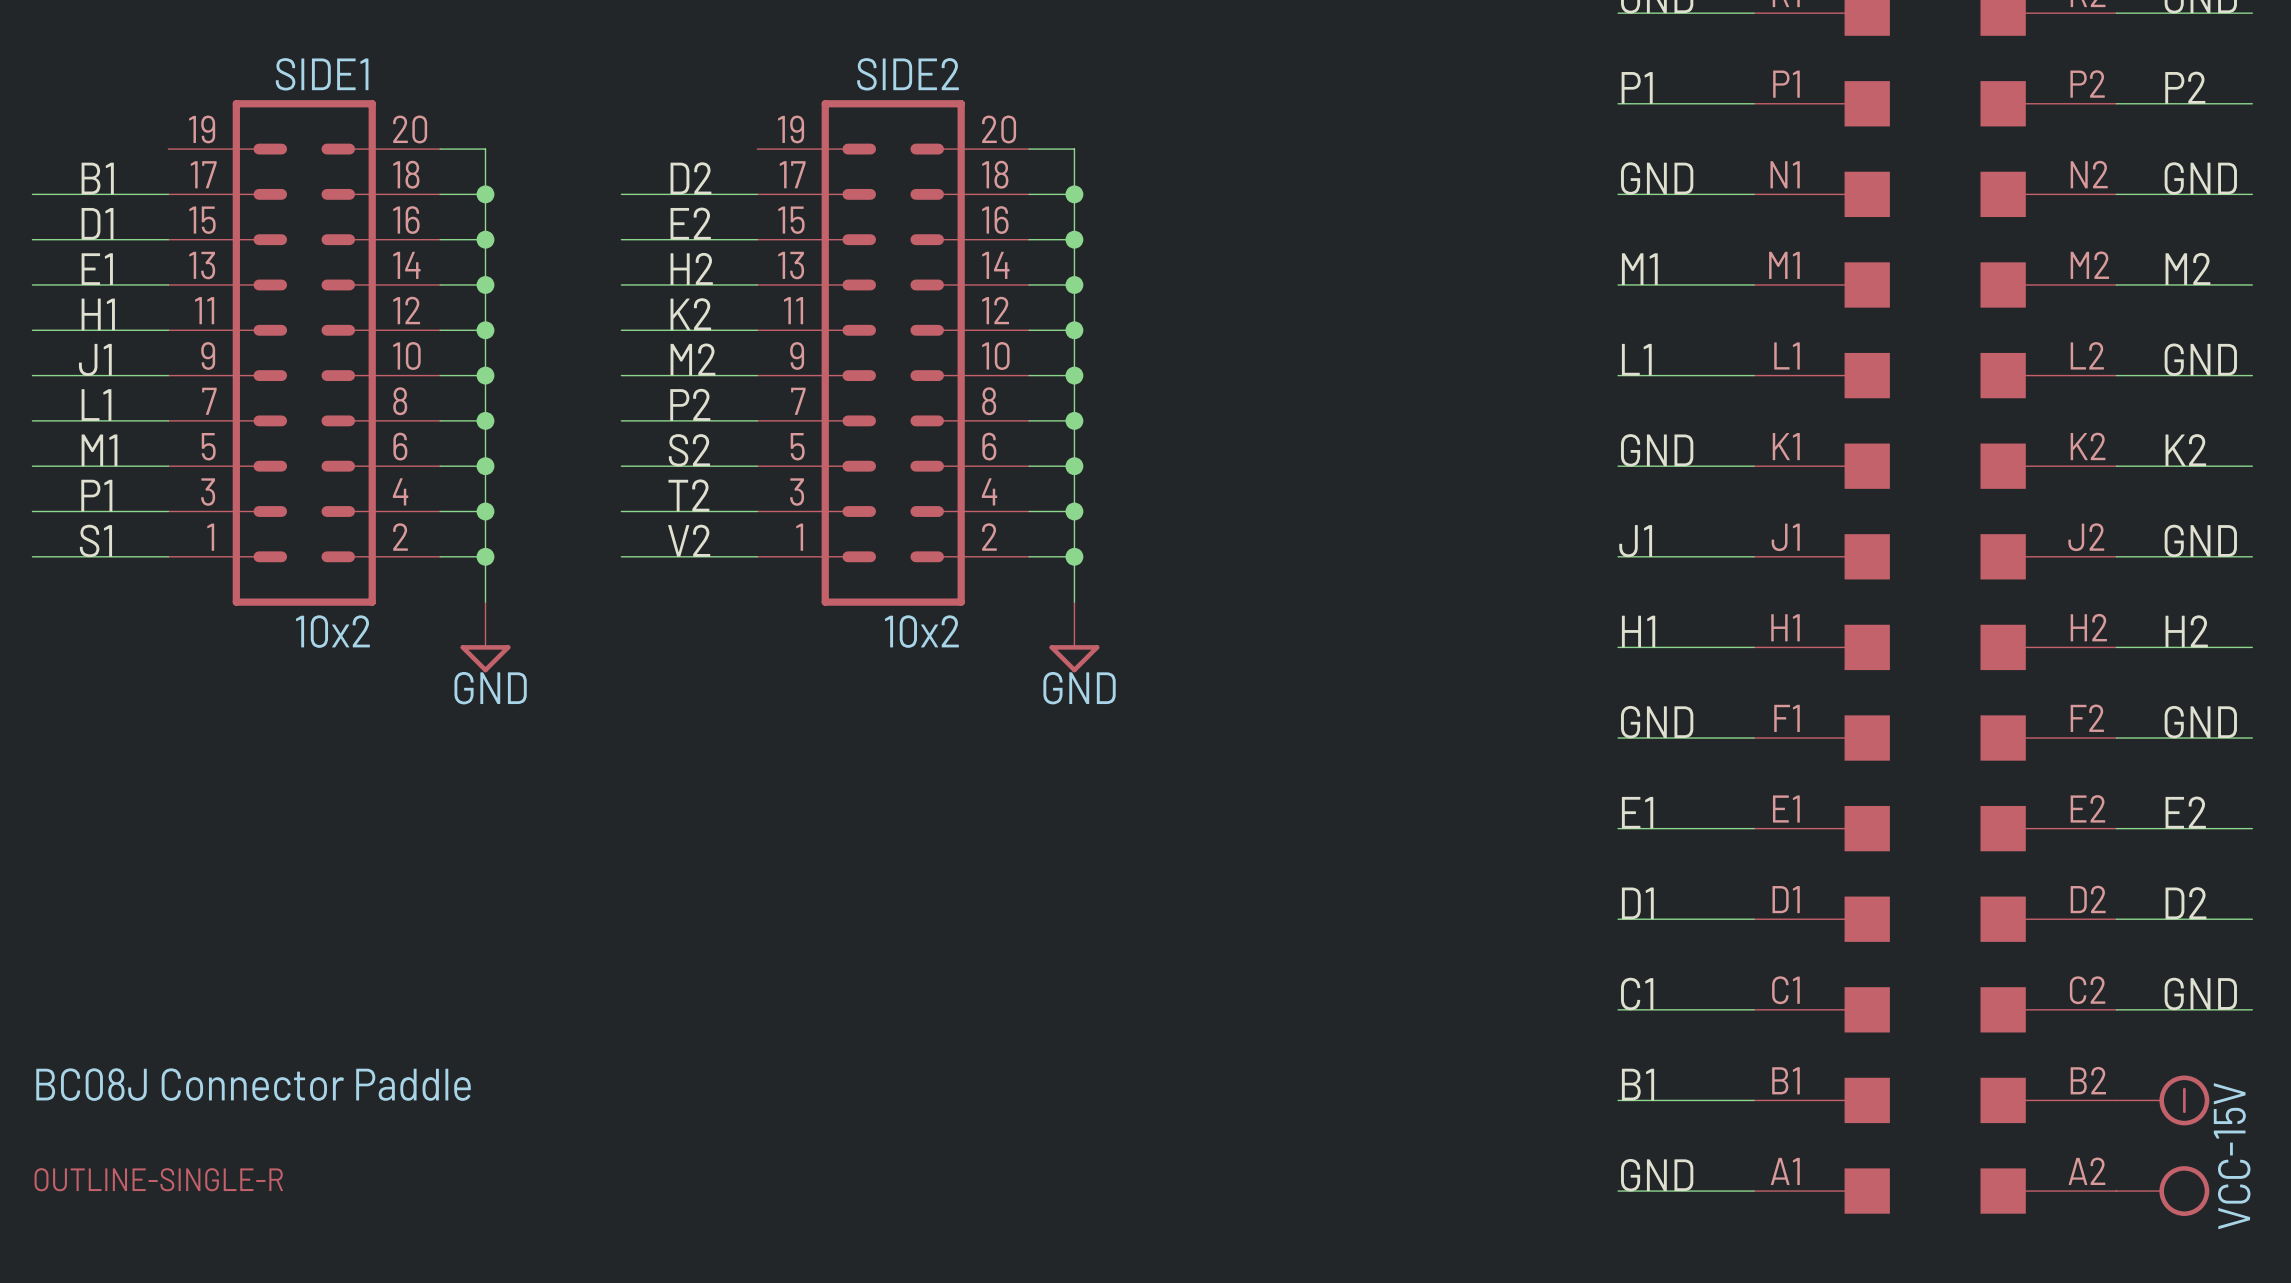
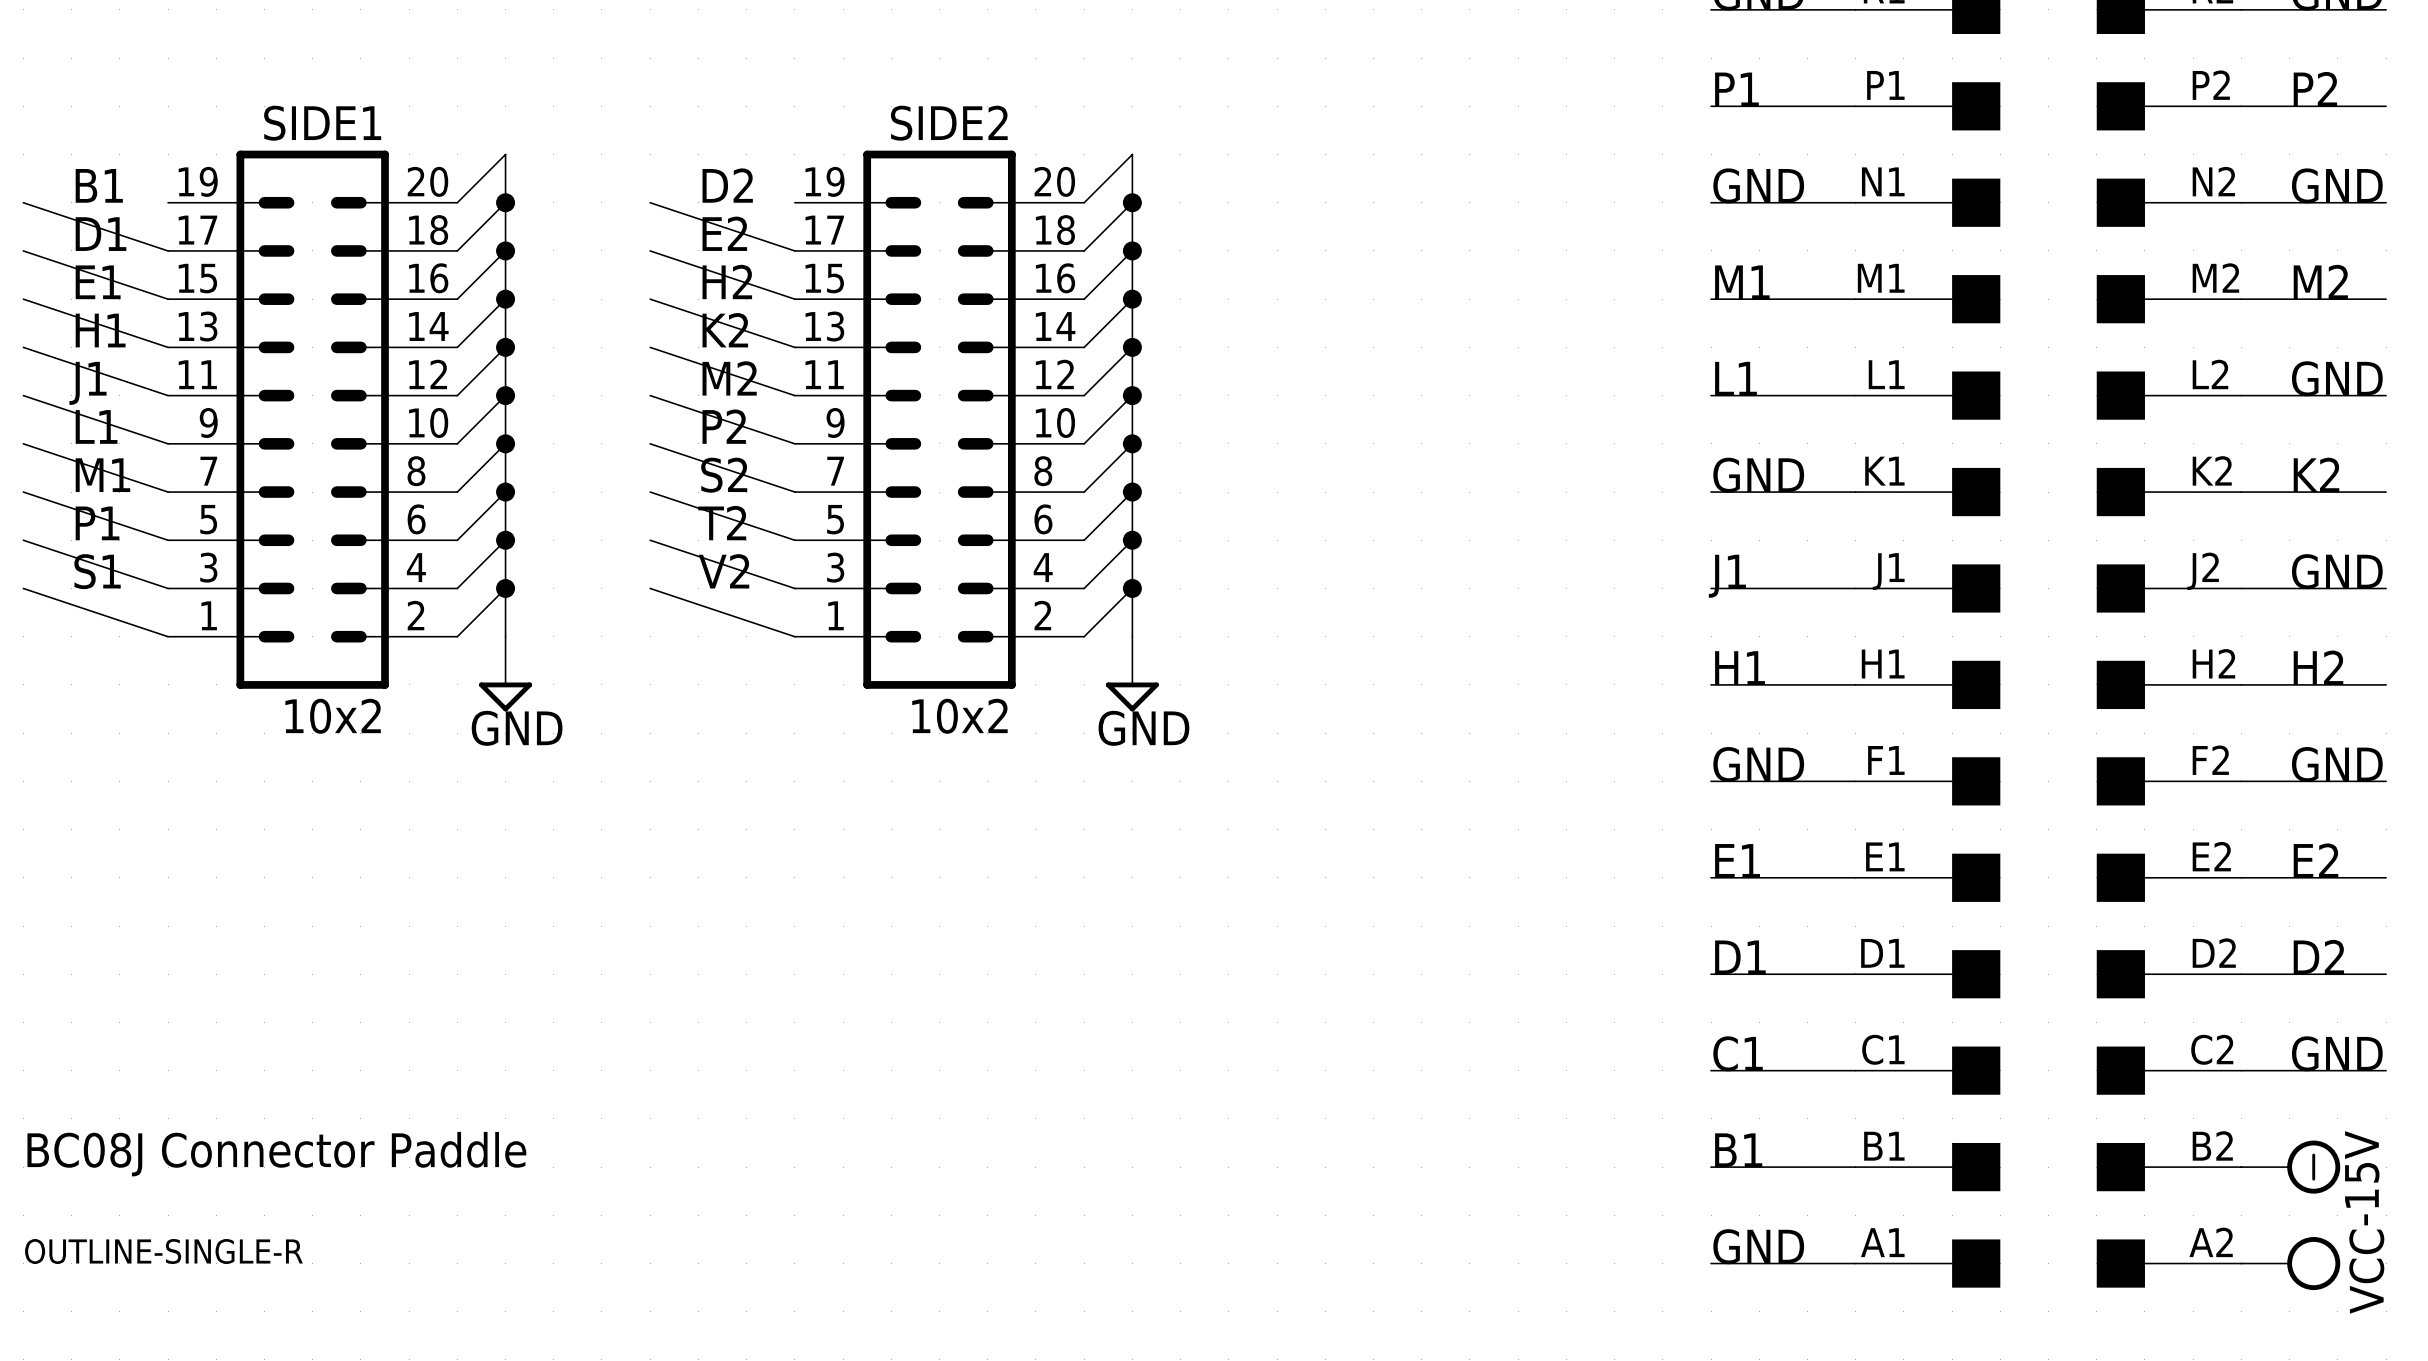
wire: (440, 149) (485, 149) -> (457, 202) (505, 154)
wire: (1029, 149) (1074, 149) -> (1084, 202) (1132, 154)
wire: (32, 194) (168, 194) -> (23, 202) (168, 250)
wire: (440, 194) (485, 194) -> (457, 250) (505, 202)
wire: (621, 194) (757, 194) -> (650, 202) (794, 250)
wire: (1029, 194) (1074, 194) -> (1084, 250) (1132, 202)
wire: (32, 239) (168, 239) -> (23, 250) (168, 299)
wire: (440, 239) (485, 239) -> (457, 299) (505, 250)
wire: (621, 239) (757, 239) -> (650, 250) (794, 299)
wire: (1029, 239) (1074, 239) -> (1084, 299) (1132, 250)
wire: (32, 284) (168, 284) -> (23, 299) (168, 347)
wire: (440, 284) (485, 284) -> (457, 347) (505, 299)
wire: (621, 284) (757, 284) -> (650, 299) (794, 347)
wire: (1029, 284) (1074, 284) -> (1084, 347) (1132, 299)
wire: (32, 330) (168, 330) -> (23, 347) (168, 395)
wire: (440, 330) (485, 330) -> (457, 395) (505, 347)
wire: (621, 330) (757, 330) -> (650, 347) (794, 395)
wire: (1029, 330) (1074, 330) -> (1084, 395) (1132, 347)
SIDE1 position: (304, 352) -> (312, 419)
SIDE2 position: (893, 352) -> (939, 419)
wire: (32, 375) (168, 375) -> (23, 395) (168, 443)
wire: (440, 375) (485, 375) -> (457, 443) (505, 395)
wire: (621, 375) (757, 375) -> (650, 395) (794, 443)
wire: (1029, 375) (1074, 375) -> (1084, 443) (1132, 395)
wire: (32, 420) (168, 420) -> (23, 443) (168, 492)
wire: (440, 420) (485, 420) -> (457, 492) (505, 443)
wire: (621, 420) (757, 420) -> (650, 443) (794, 492)
wire: (1029, 420) (1074, 420) -> (1084, 492) (1132, 443)
wire: (32, 466) (168, 466) -> (23, 492) (168, 540)
wire: (440, 466) (485, 466) -> (457, 540) (505, 492)
wire: (621, 466) (757, 466) -> (650, 492) (794, 540)
wire: (1029, 466) (1074, 466) -> (1084, 540) (1132, 492)
wire: (32, 511) (168, 511) -> (23, 540) (168, 588)
wire: (440, 511) (485, 511) -> (457, 588) (505, 540)
wire: (621, 511) (757, 511) -> (650, 540) (794, 588)
wire: (1029, 511) (1074, 511) -> (1084, 588) (1132, 540)
wire: (32, 556) (168, 556) -> (23, 588) (168, 636)
wire: (440, 556) (485, 556) -> (457, 636) (505, 588)
wire: (621, 556) (757, 556) -> (650, 588) (794, 636)
wire: (1029, 556) (1074, 556) -> (1084, 636) (1132, 588)

